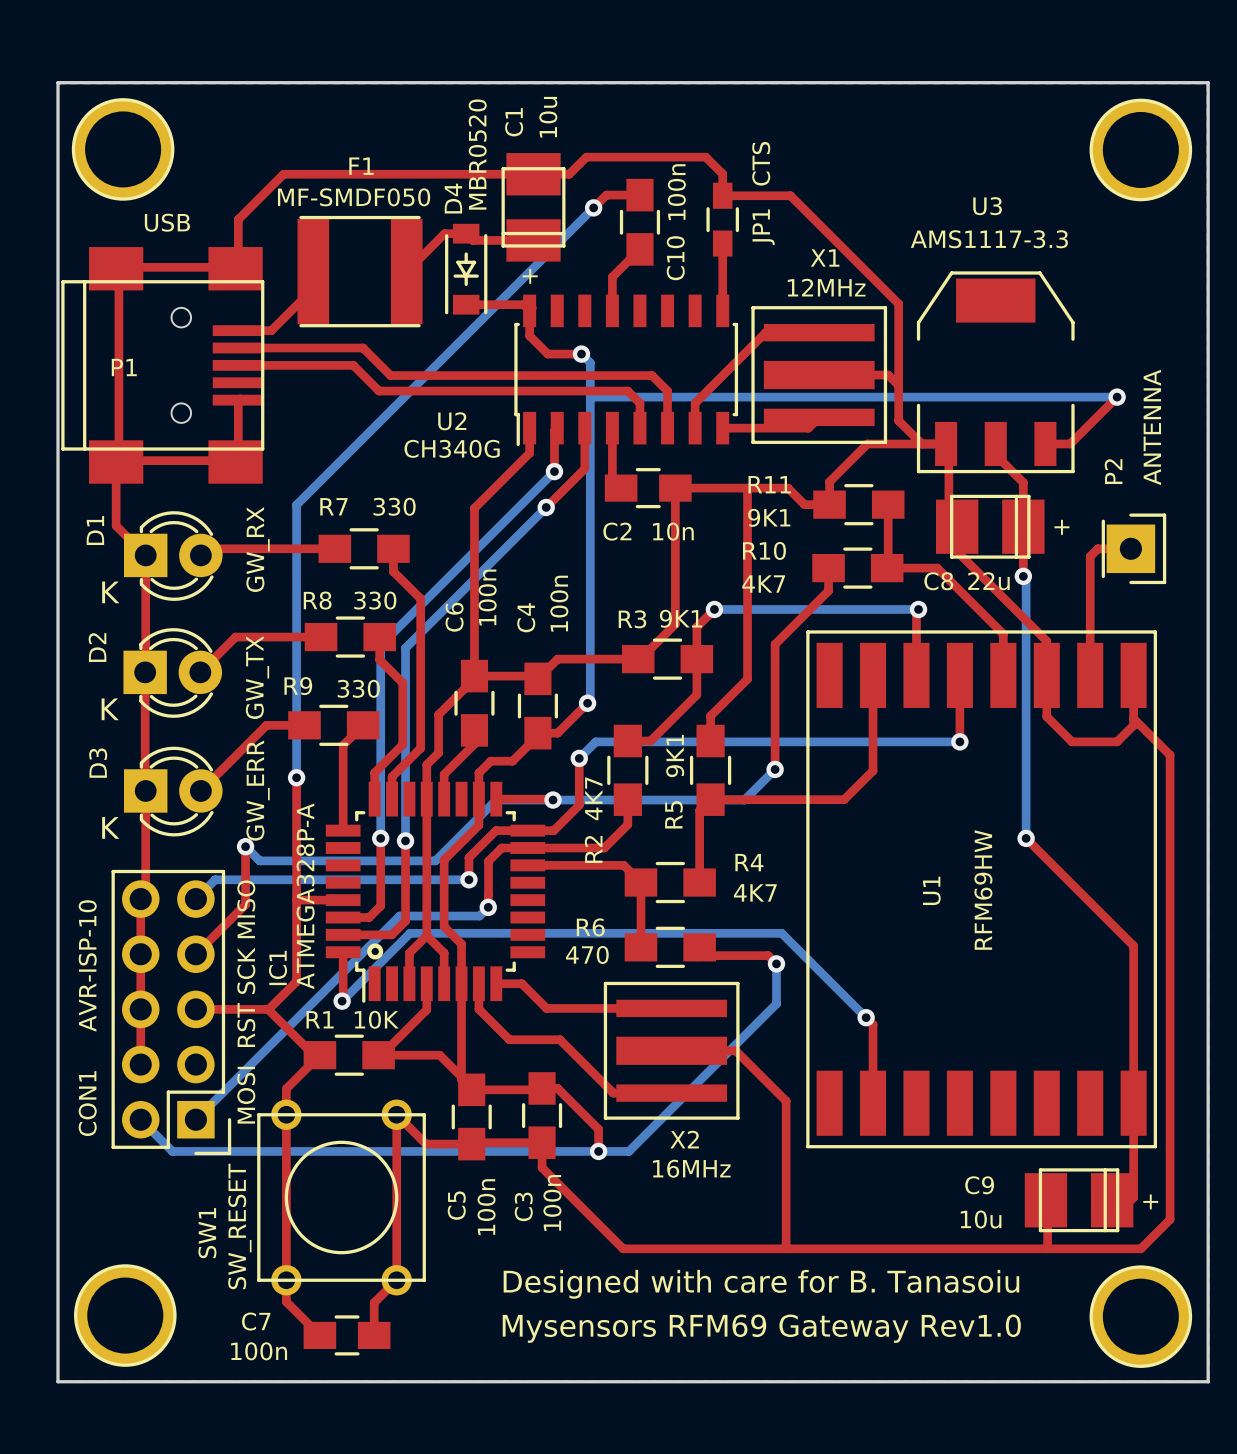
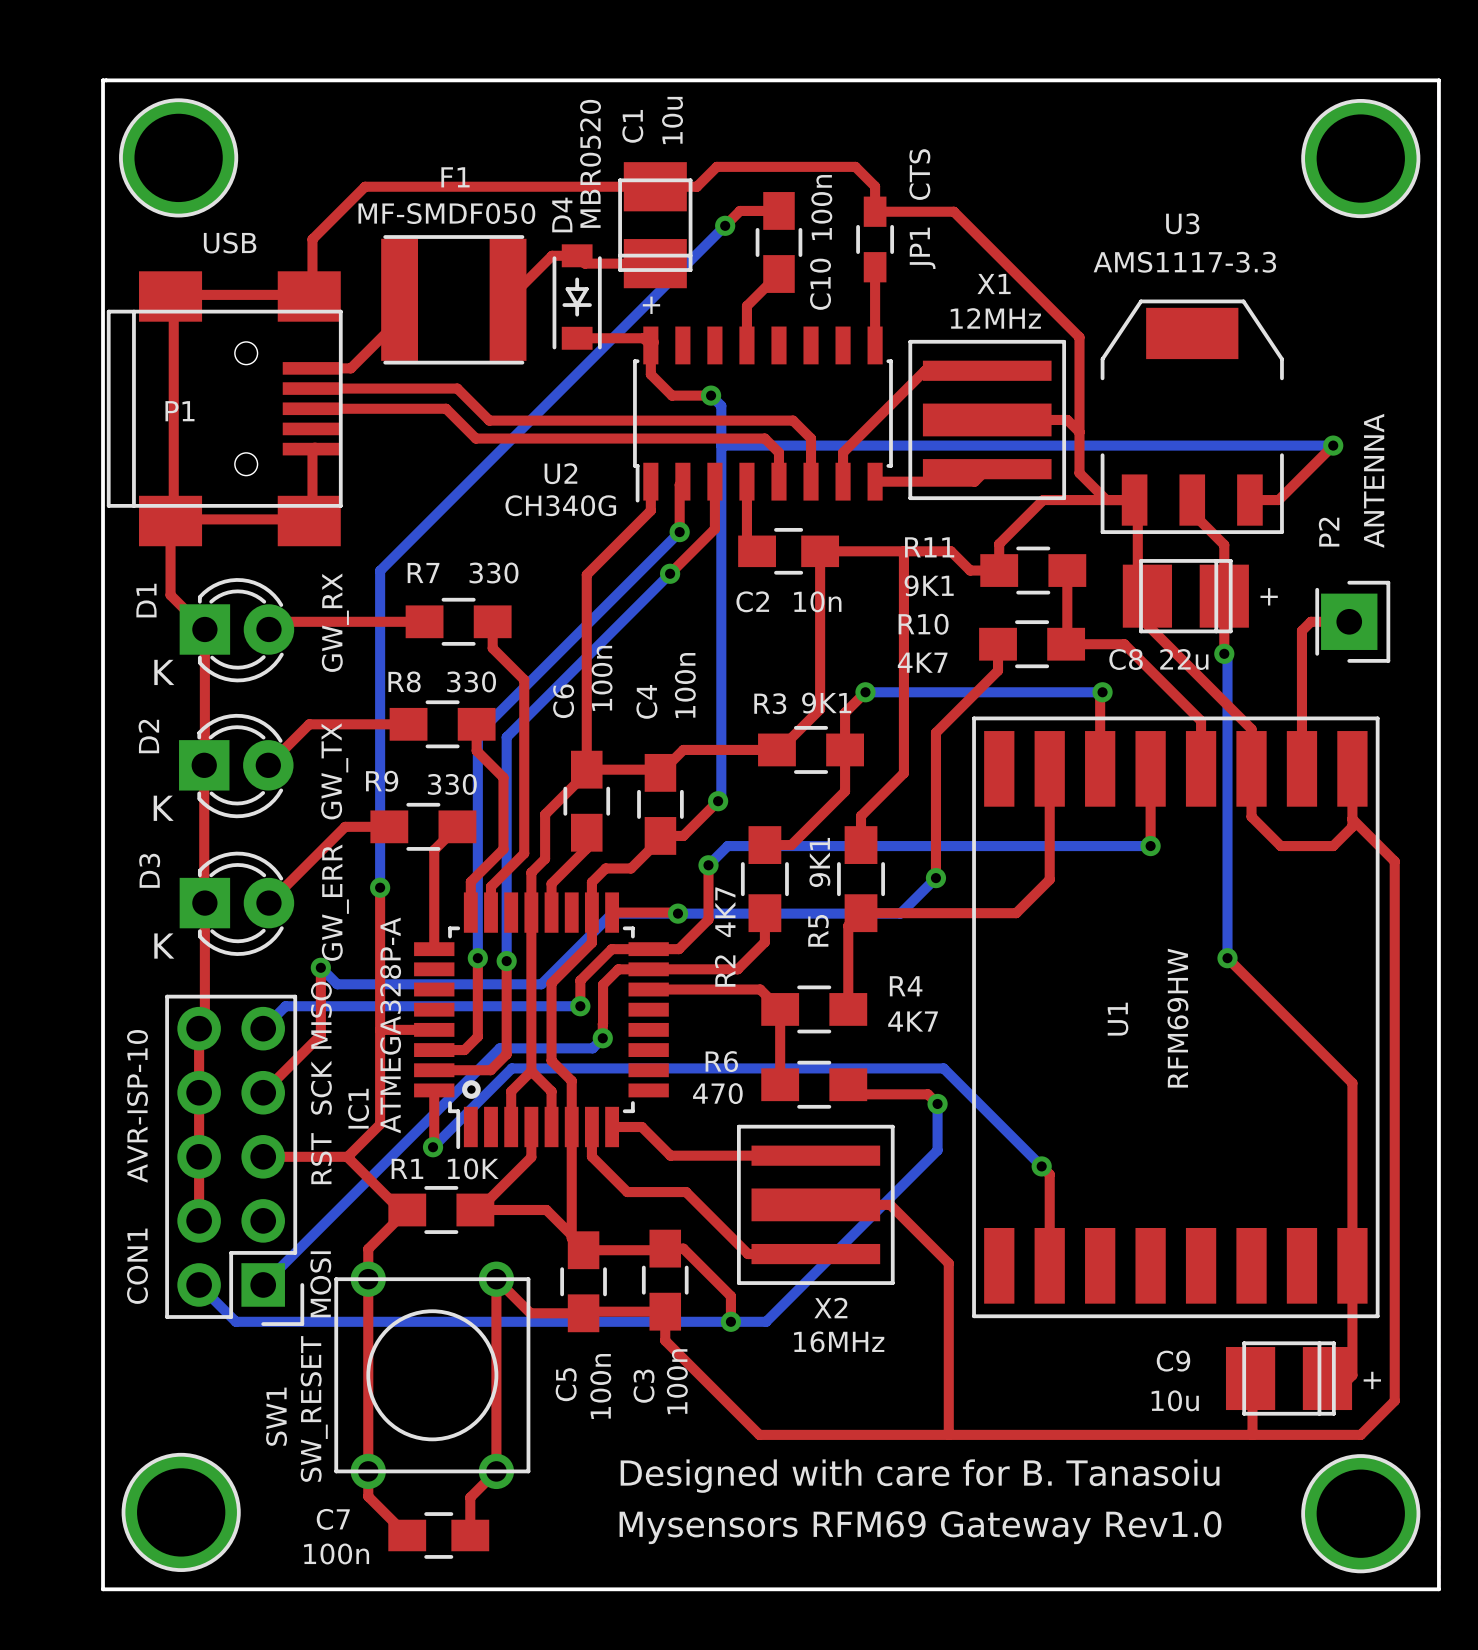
text: none -> MISO (321, 1015)
text: none -> SCK (321, 1087)
text: MOSI RST SCK MISO (246, 1002) -> RST (321, 1158)
text: none -> MOSI (320, 1284)

